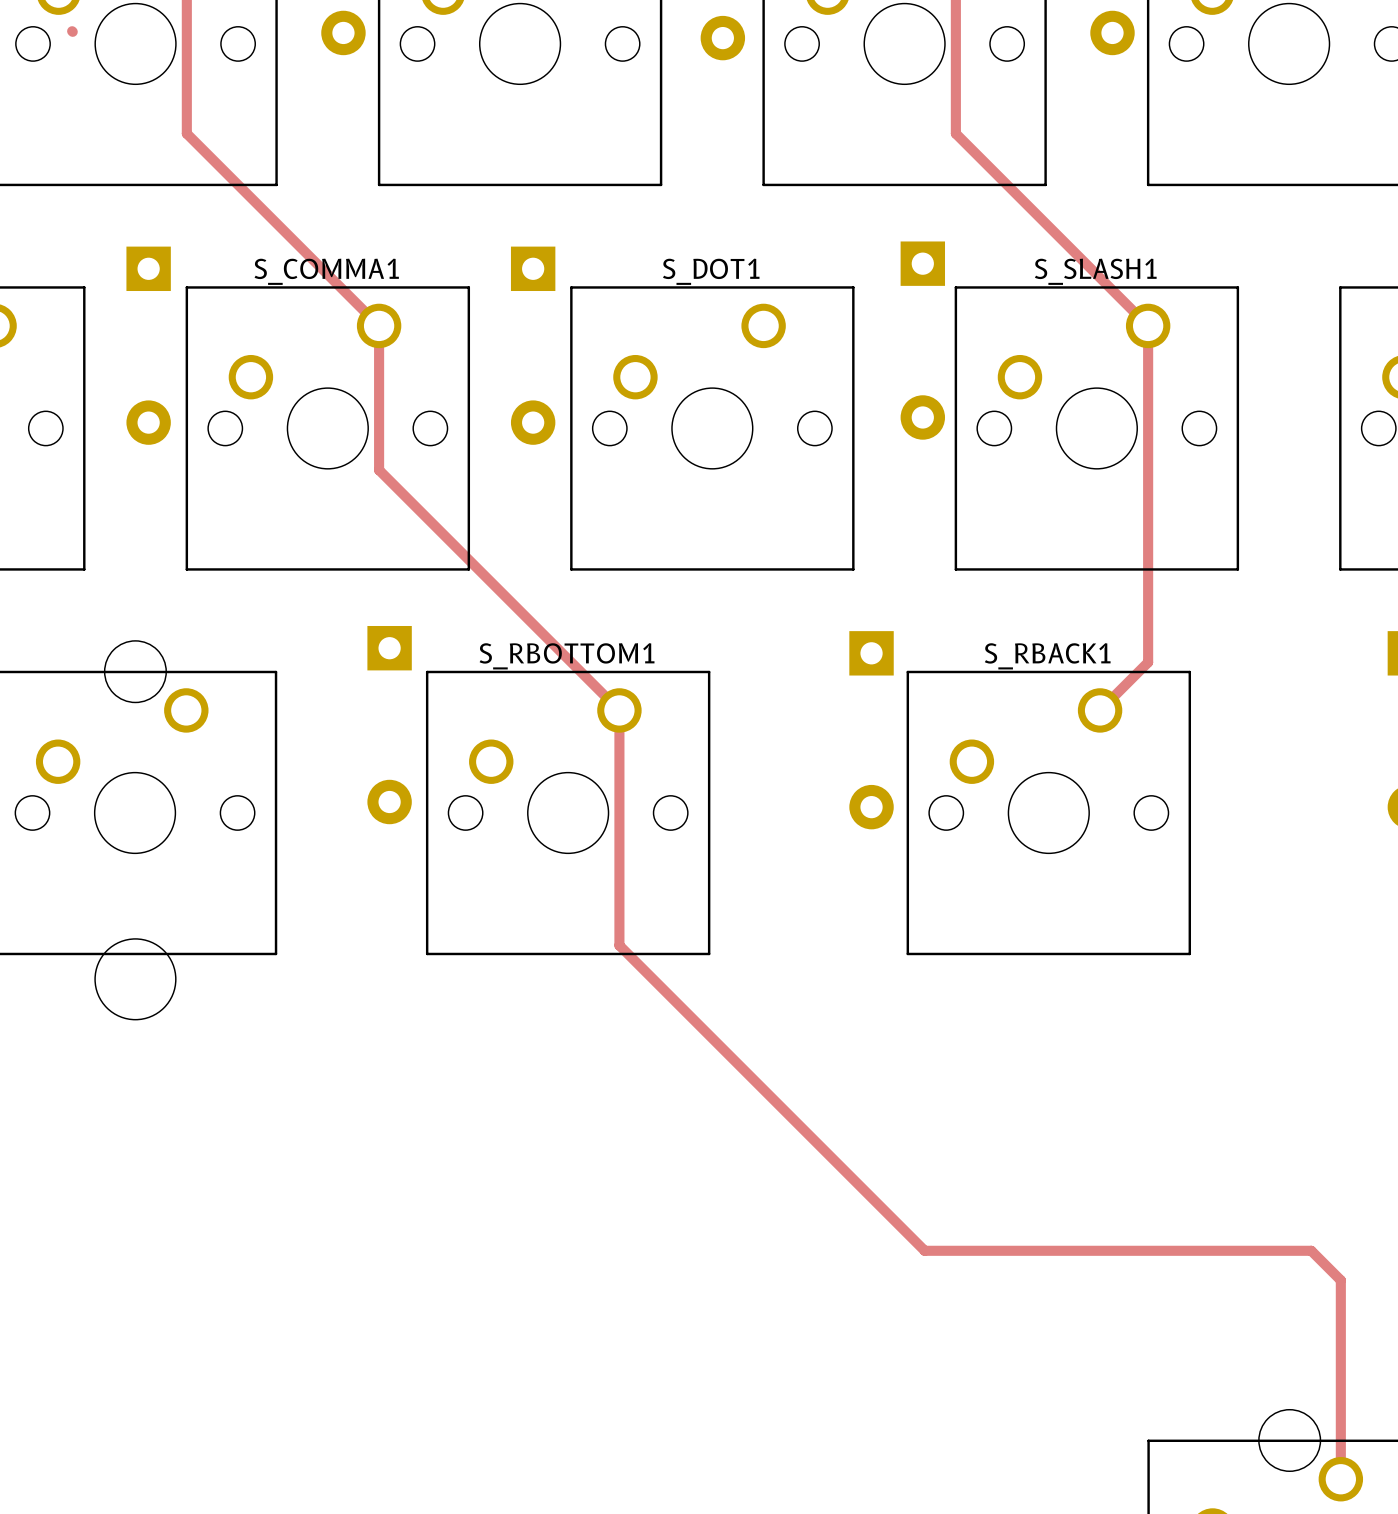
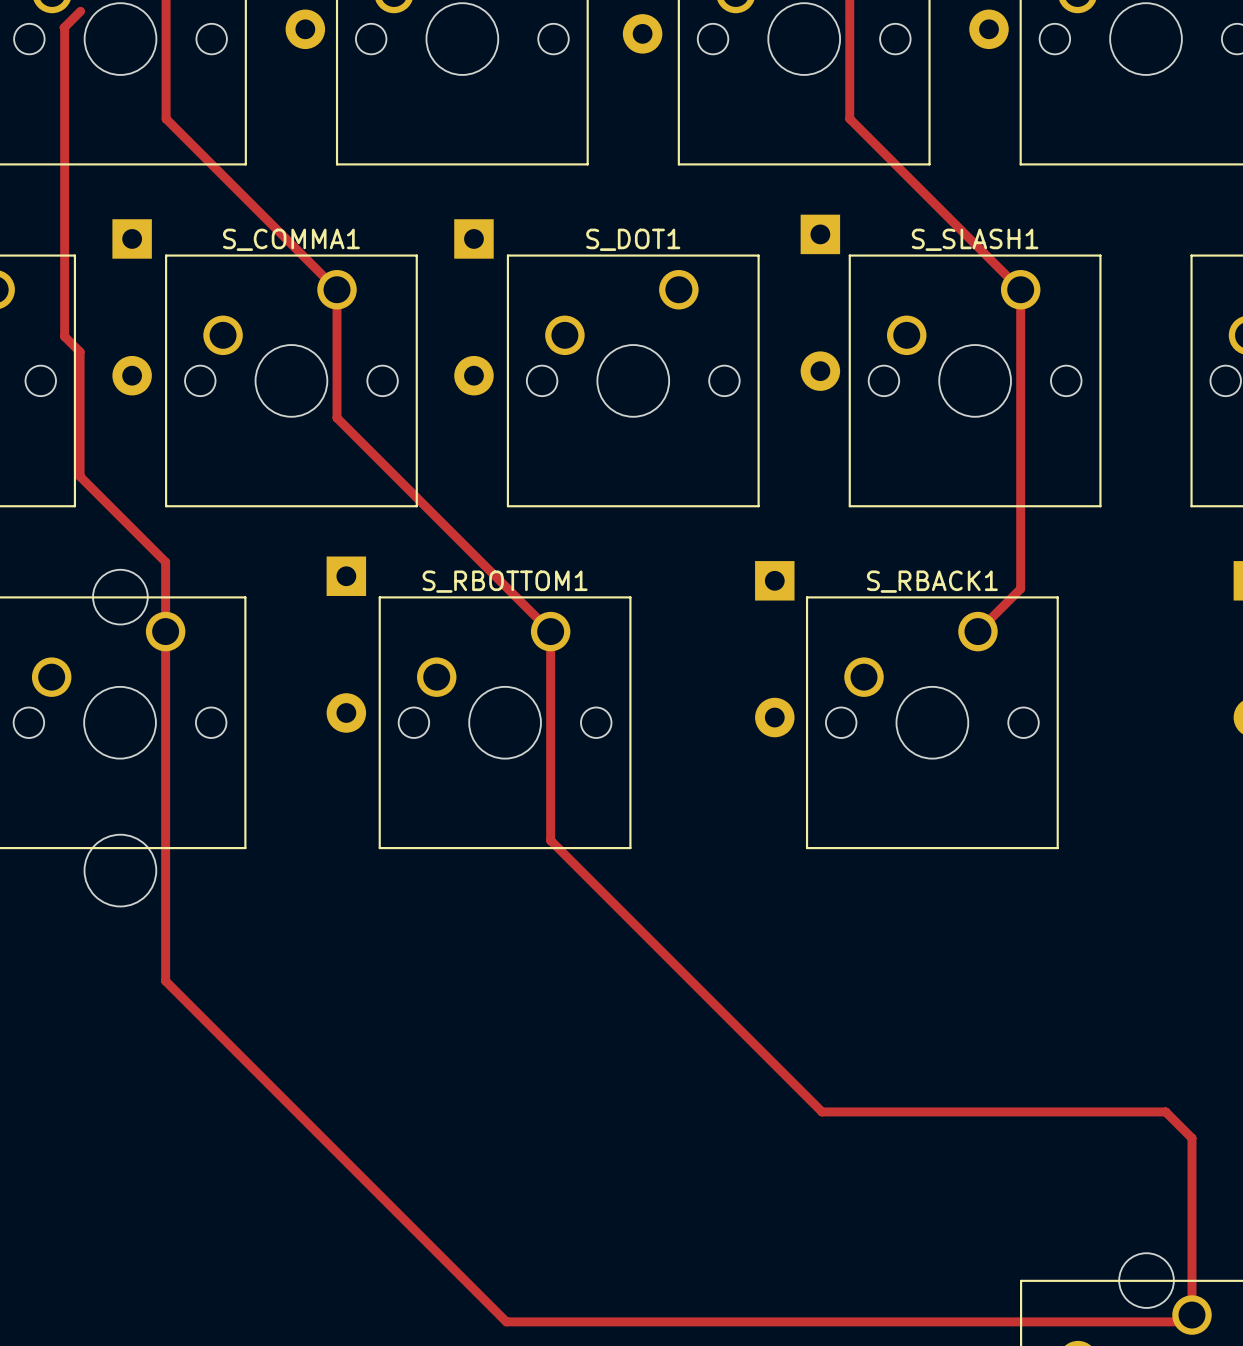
track: none -> (80, 11) (64, 27)
track: none -> (64, 28) (64, 336) (80, 352) (80, 476) (165, 562) (165, 981) (506, 1321) (1185, 1321)

